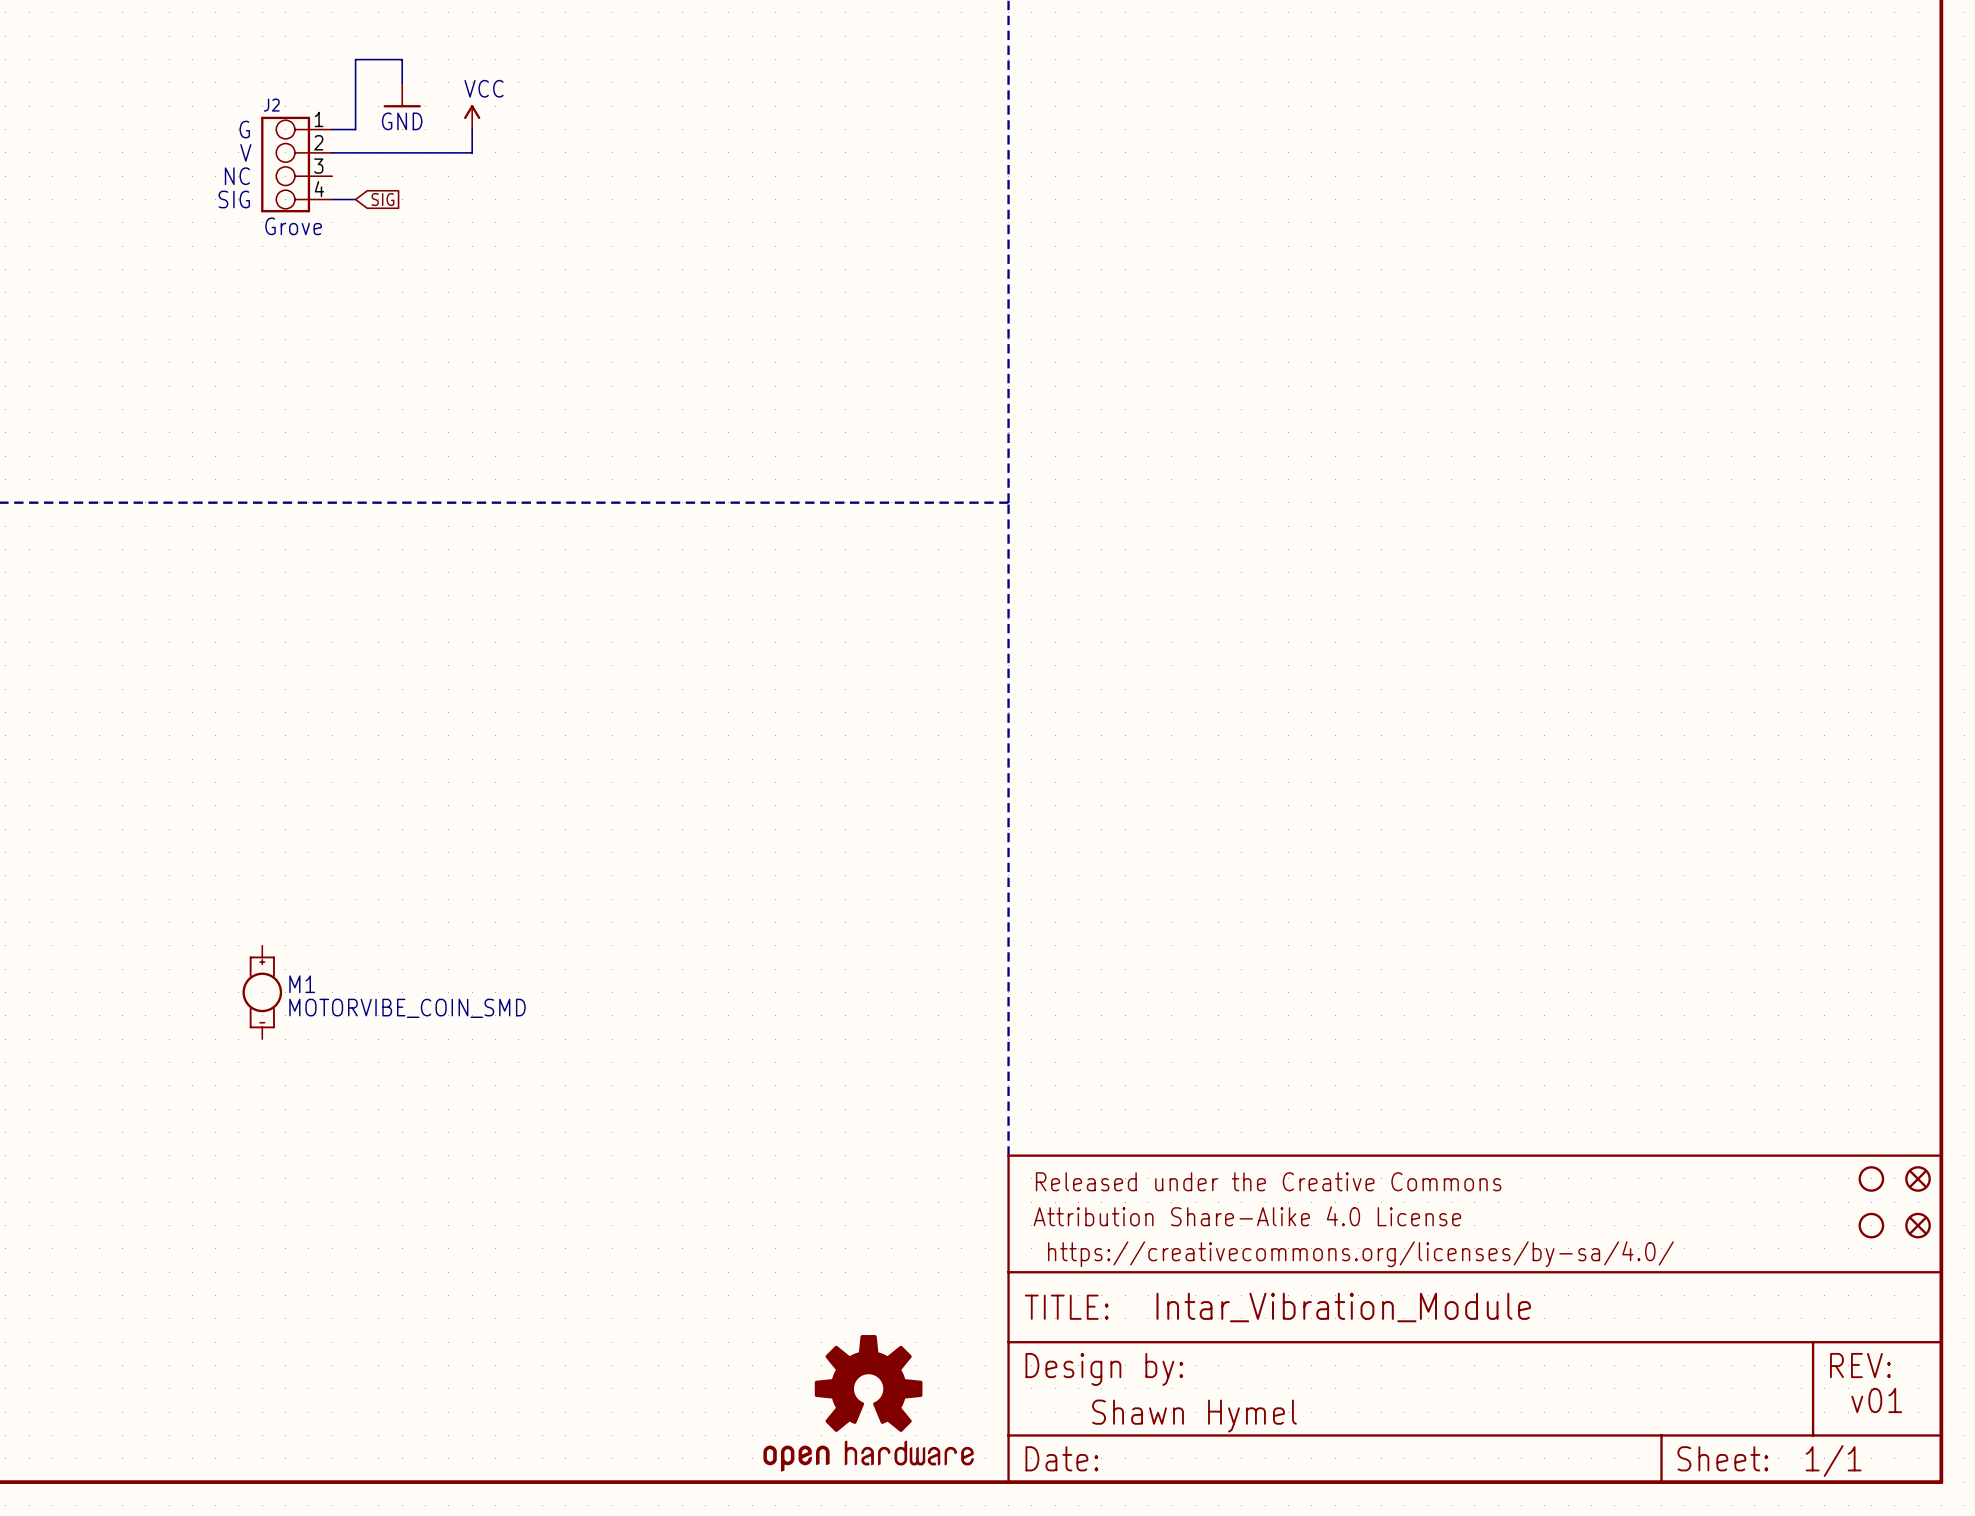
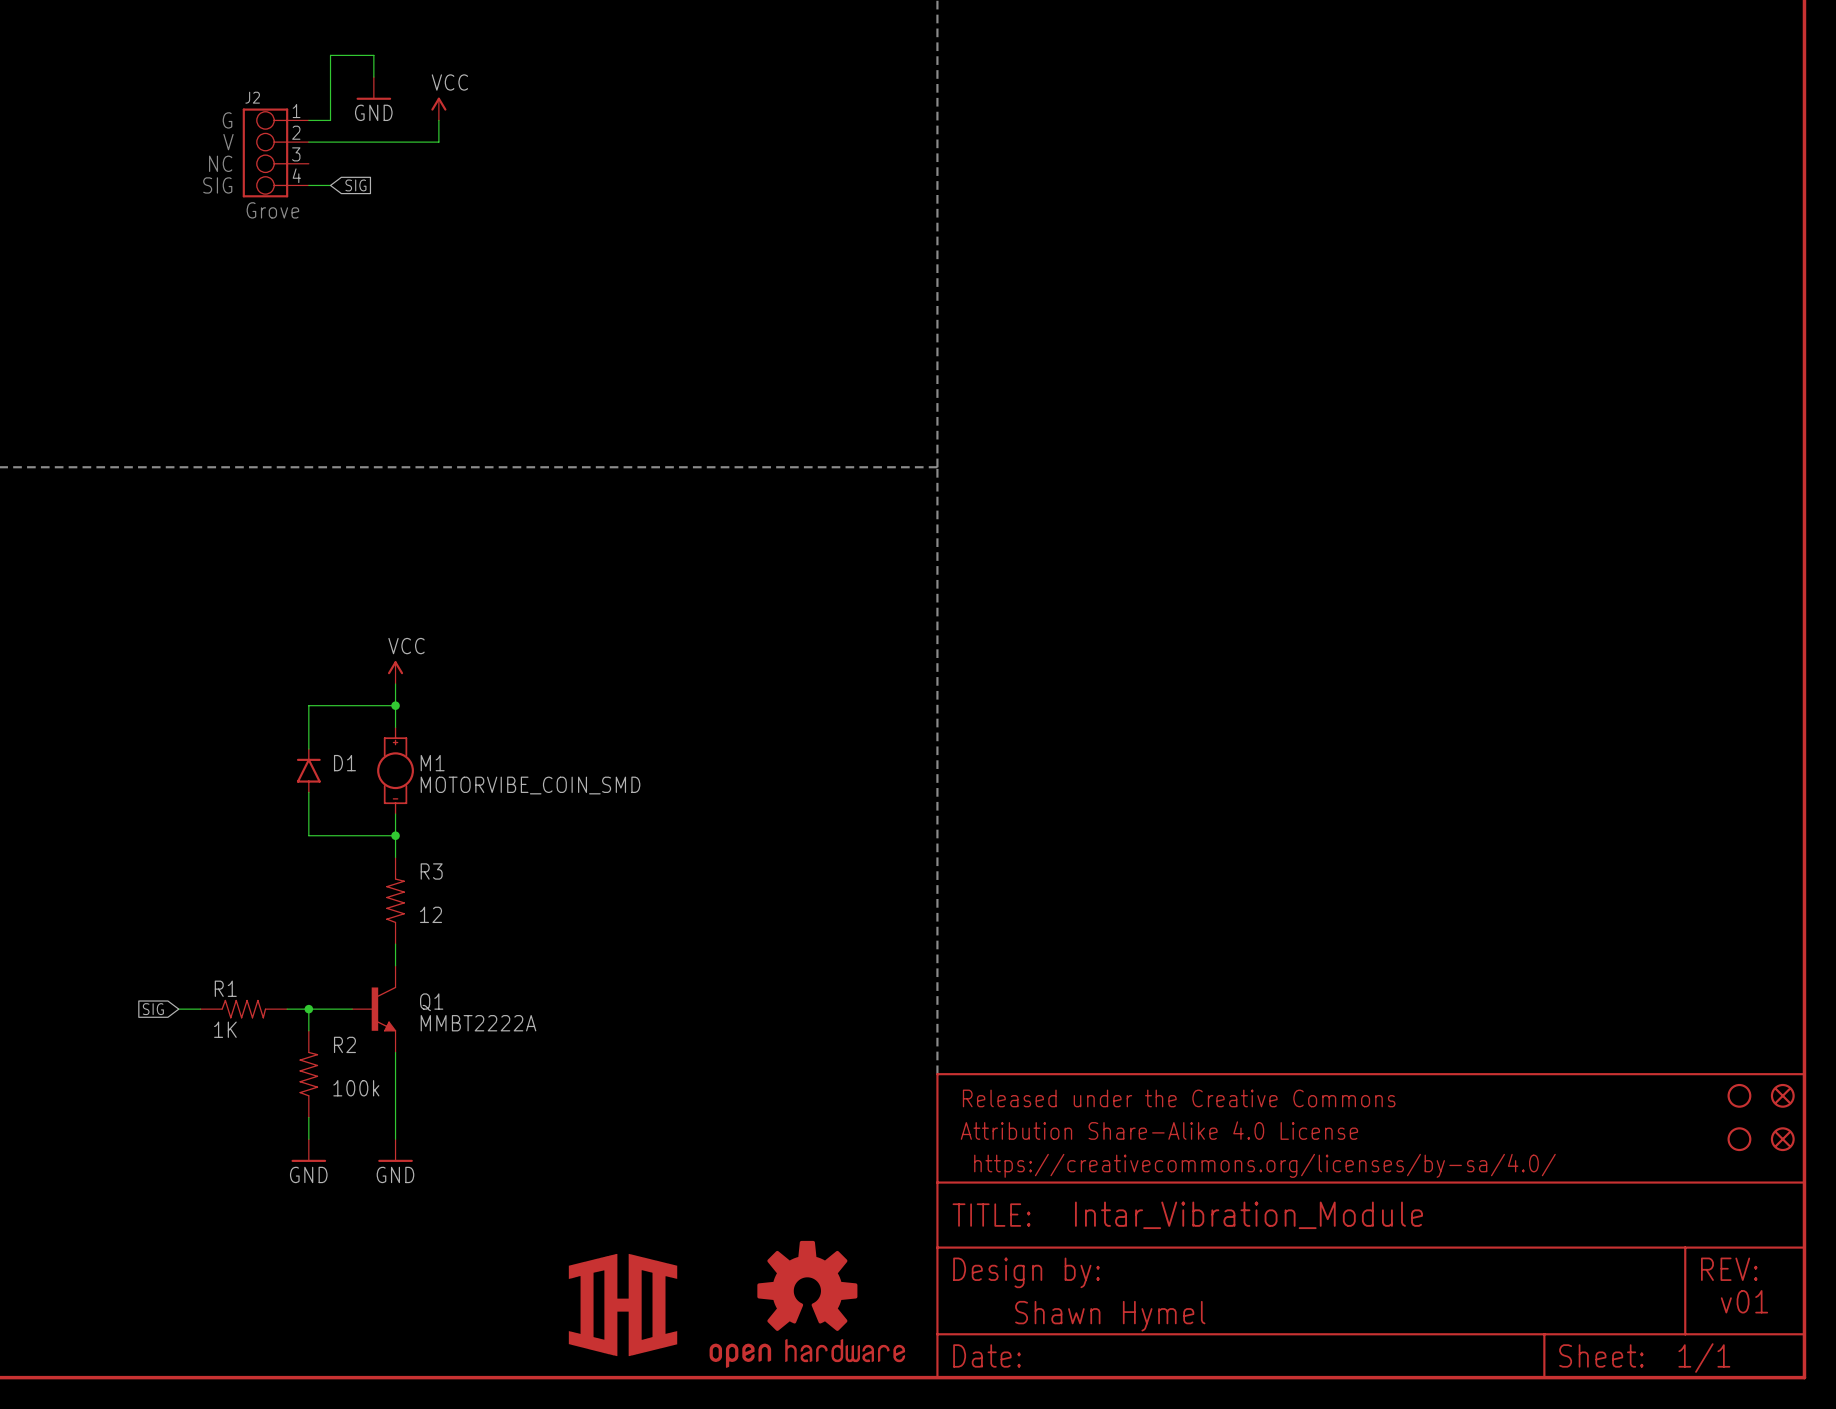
power symbol: none -> VCC (395, 672)
wire: none -> (395, 684) (395, 727)
wire: none -> (395, 705) (308, 705) (308, 749)
junction: none -> (395, 705)
D1: none -> (308, 770)
wire: none -> (308, 792) (308, 835) (395, 835)
wire: none -> (395, 814) (395, 857)
junction: none -> (395, 835)
R3: none -> 12 (395, 900)
M1 position: (262, 992) -> (395, 770)
wire: none -> (395, 944) (395, 965)
global label: none -> SIG (153, 1009)
wire: none -> (178, 1009) (200, 1009)
R1: none -> 1K (243, 1009)
wire: none -> (287, 1009) (352, 1009)
wire: none -> (308, 1009) (308, 1030)
junction: none -> (308, 1009)
Q1: none -> MMBT2222A (374, 1009)
wire: none -> (395, 1052) (395, 1139)
R2: none -> 100k (308, 1074)
wire: none -> (308, 1117) (308, 1139)
power symbol: none -> GND (308, 1150)
power symbol: none -> GND (395, 1150)
part: none -> (623, 1305)

